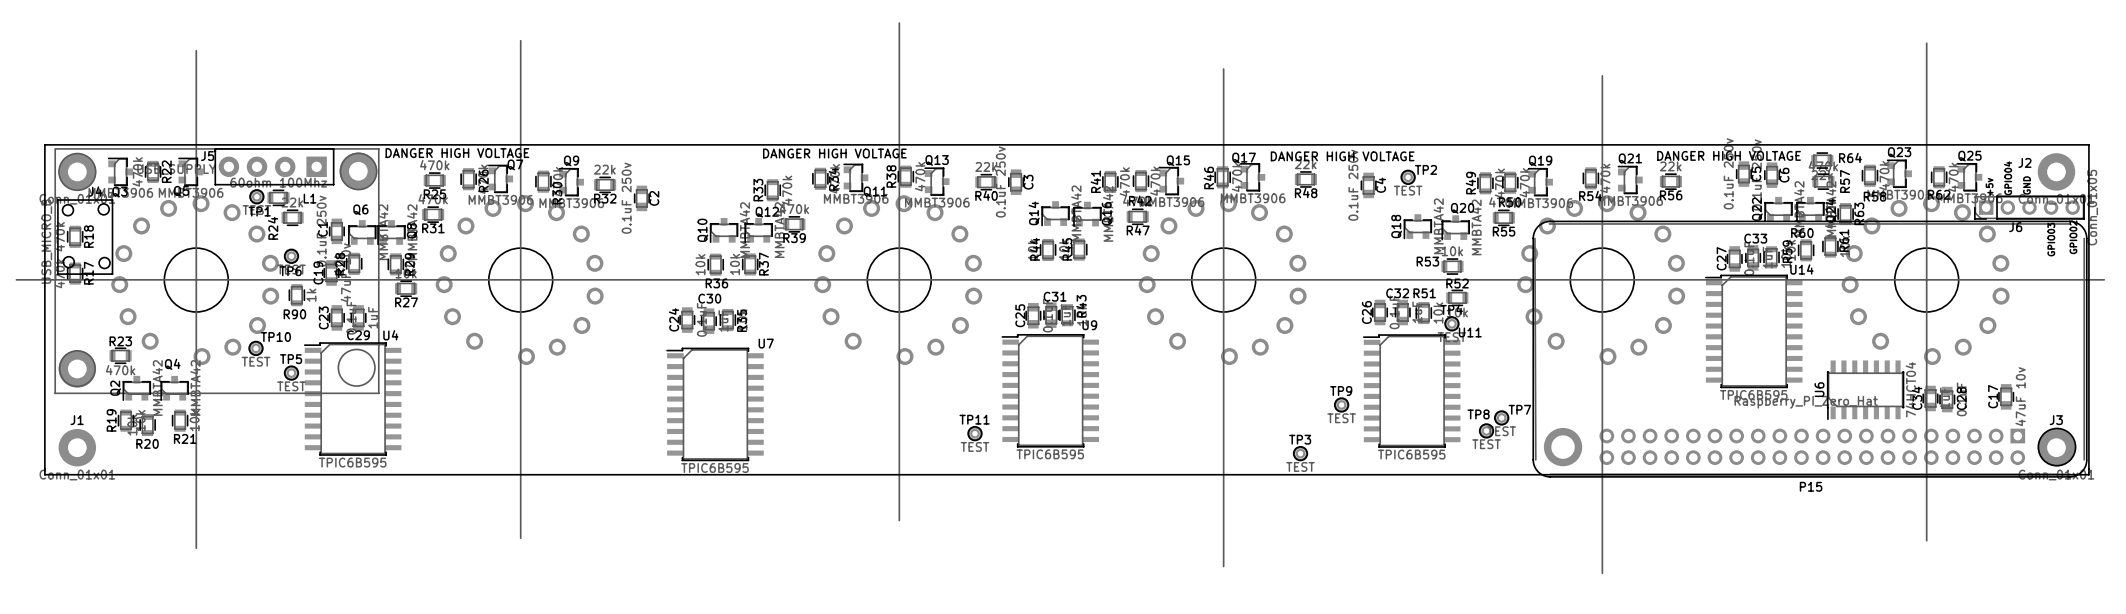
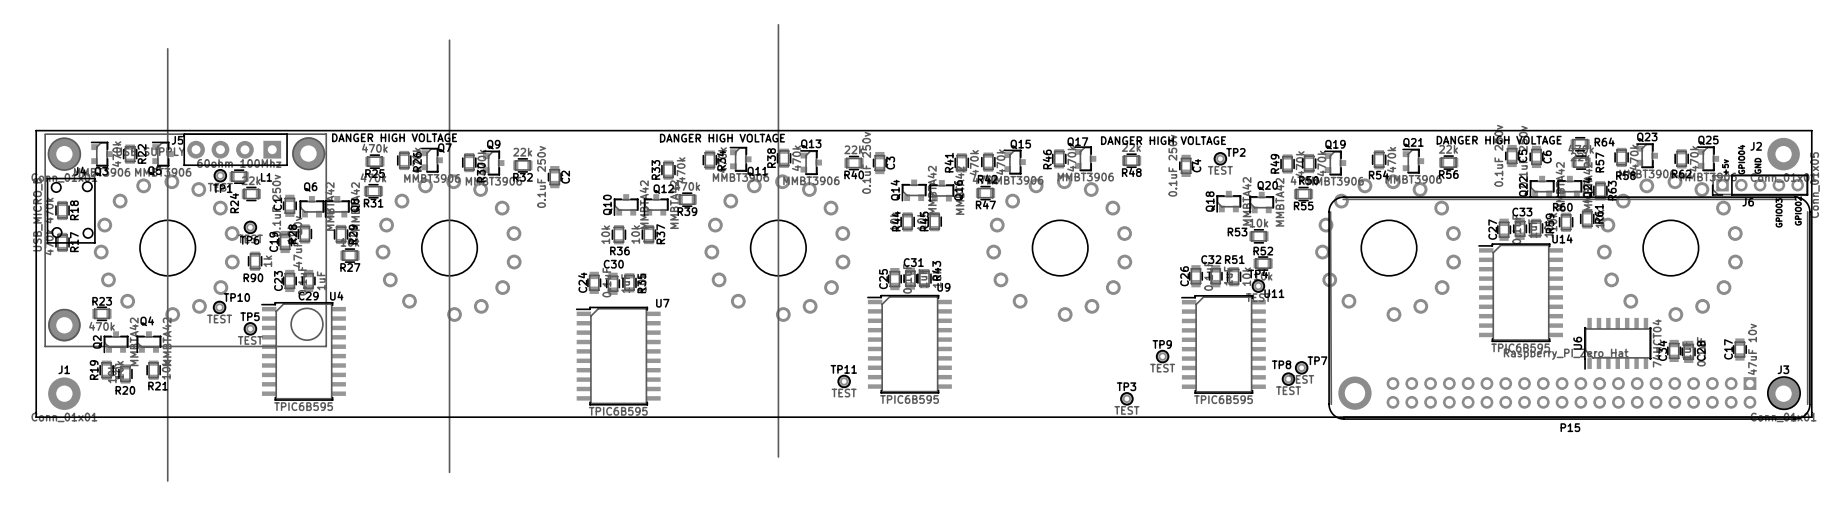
line: (1926, 43) (1926, 540) -> none
line: (1223, 69) (1223, 566) -> none
line: (1602, 75) (1602, 573) -> none
line: (16, 279) (2104, 279) -> none

